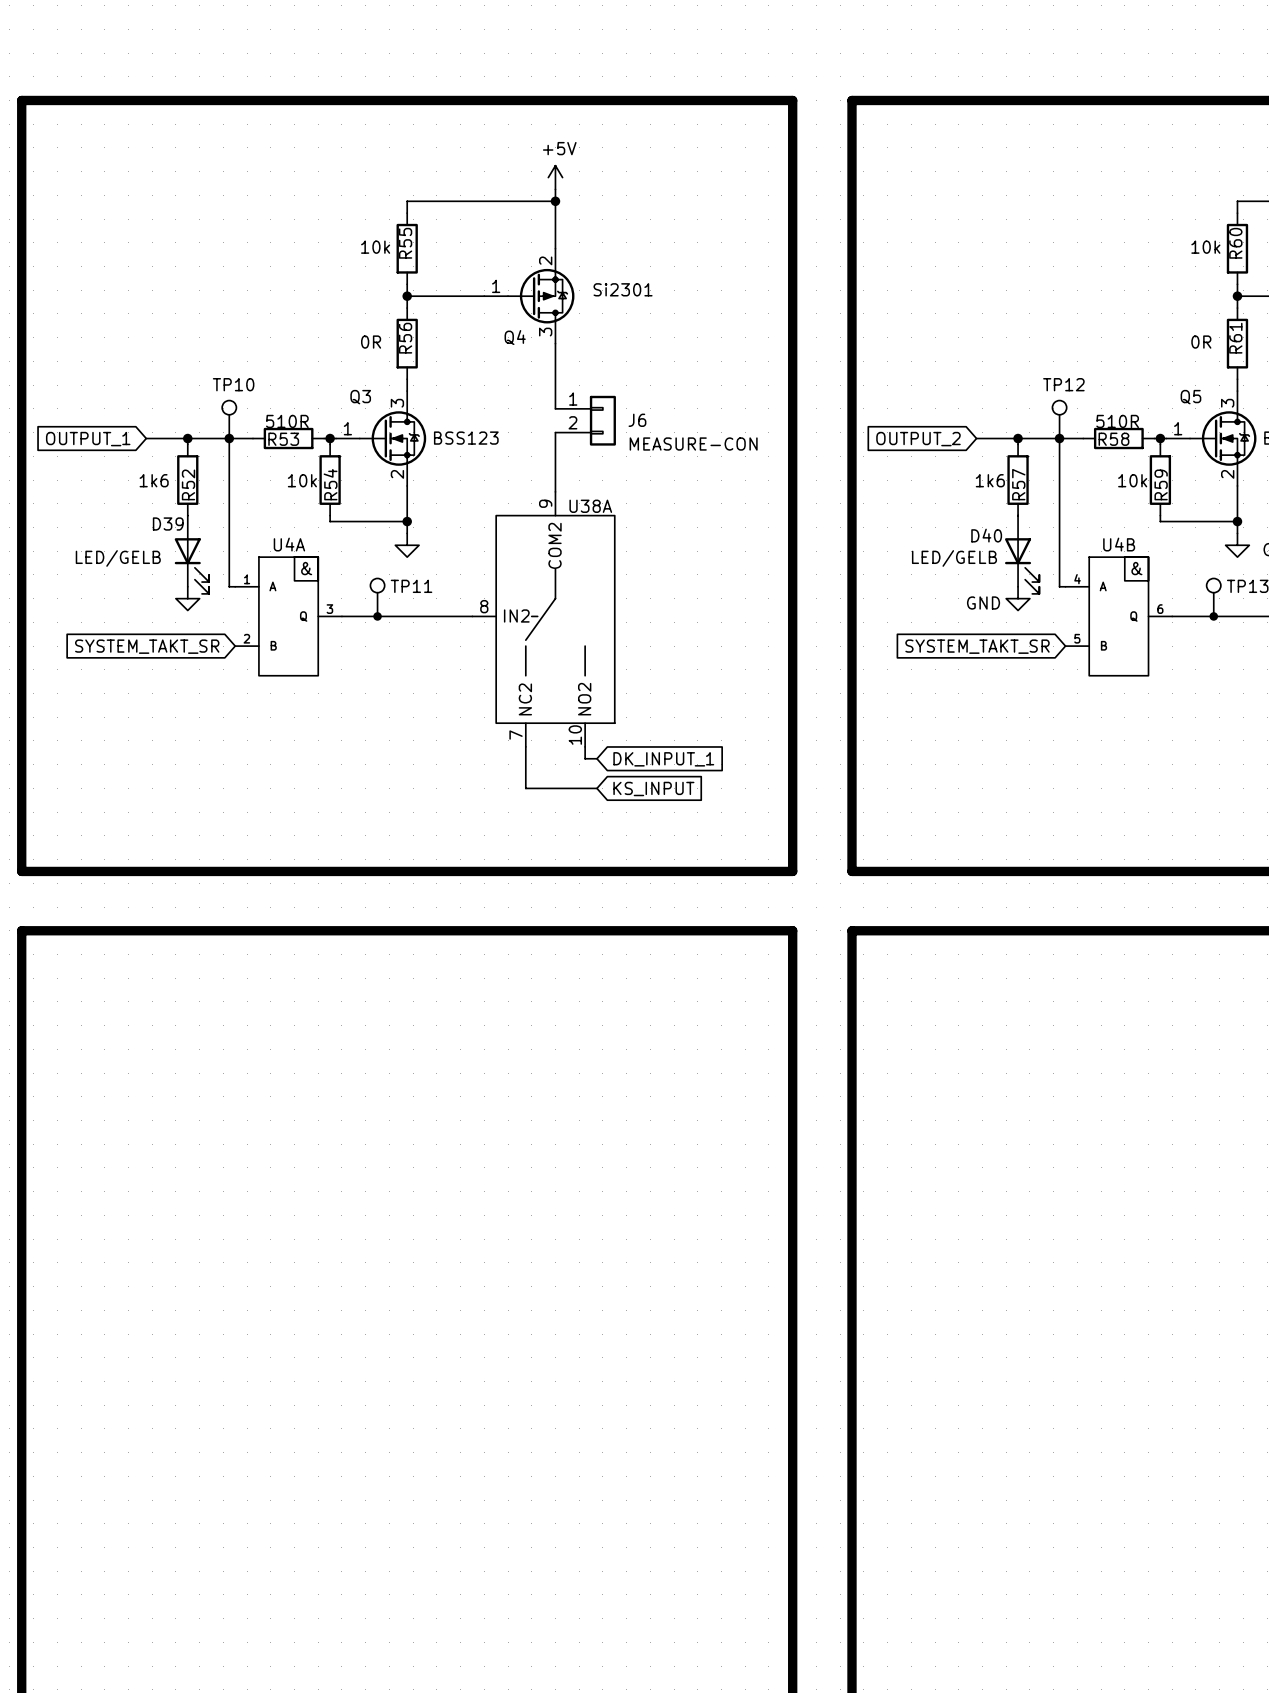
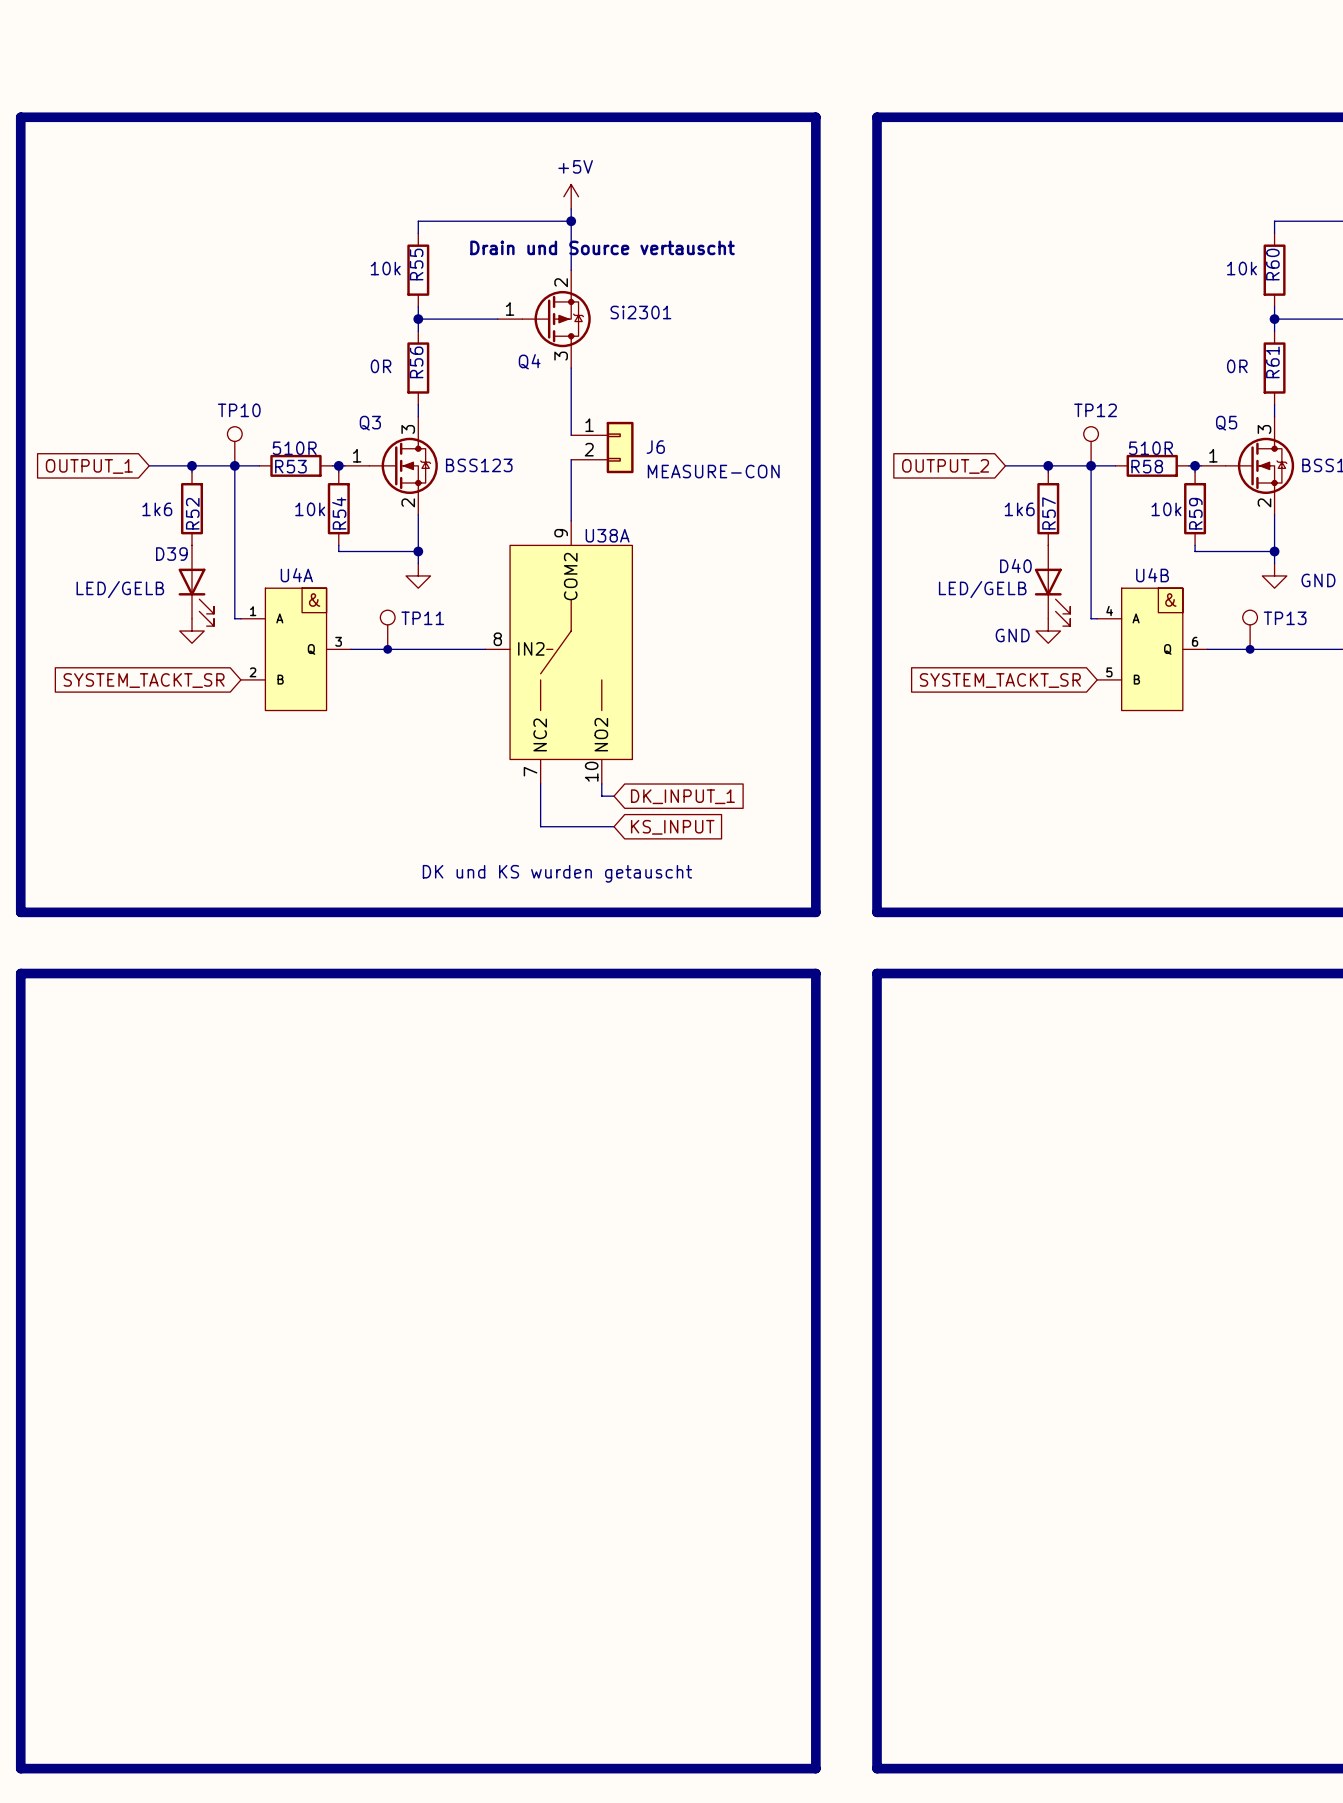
text: none -> Drain und Source vertauscht (602, 247)
global label: SYSTEM_TAKT_SR (147, 646) -> SYSTEM_TACKT_SR (144, 680)
global label: SYSTEM_TAKT_SR (977, 646) -> SYSTEM_TACKT_SR (1000, 680)
text: none -> DK und KS wurden getauscht (557, 873)

